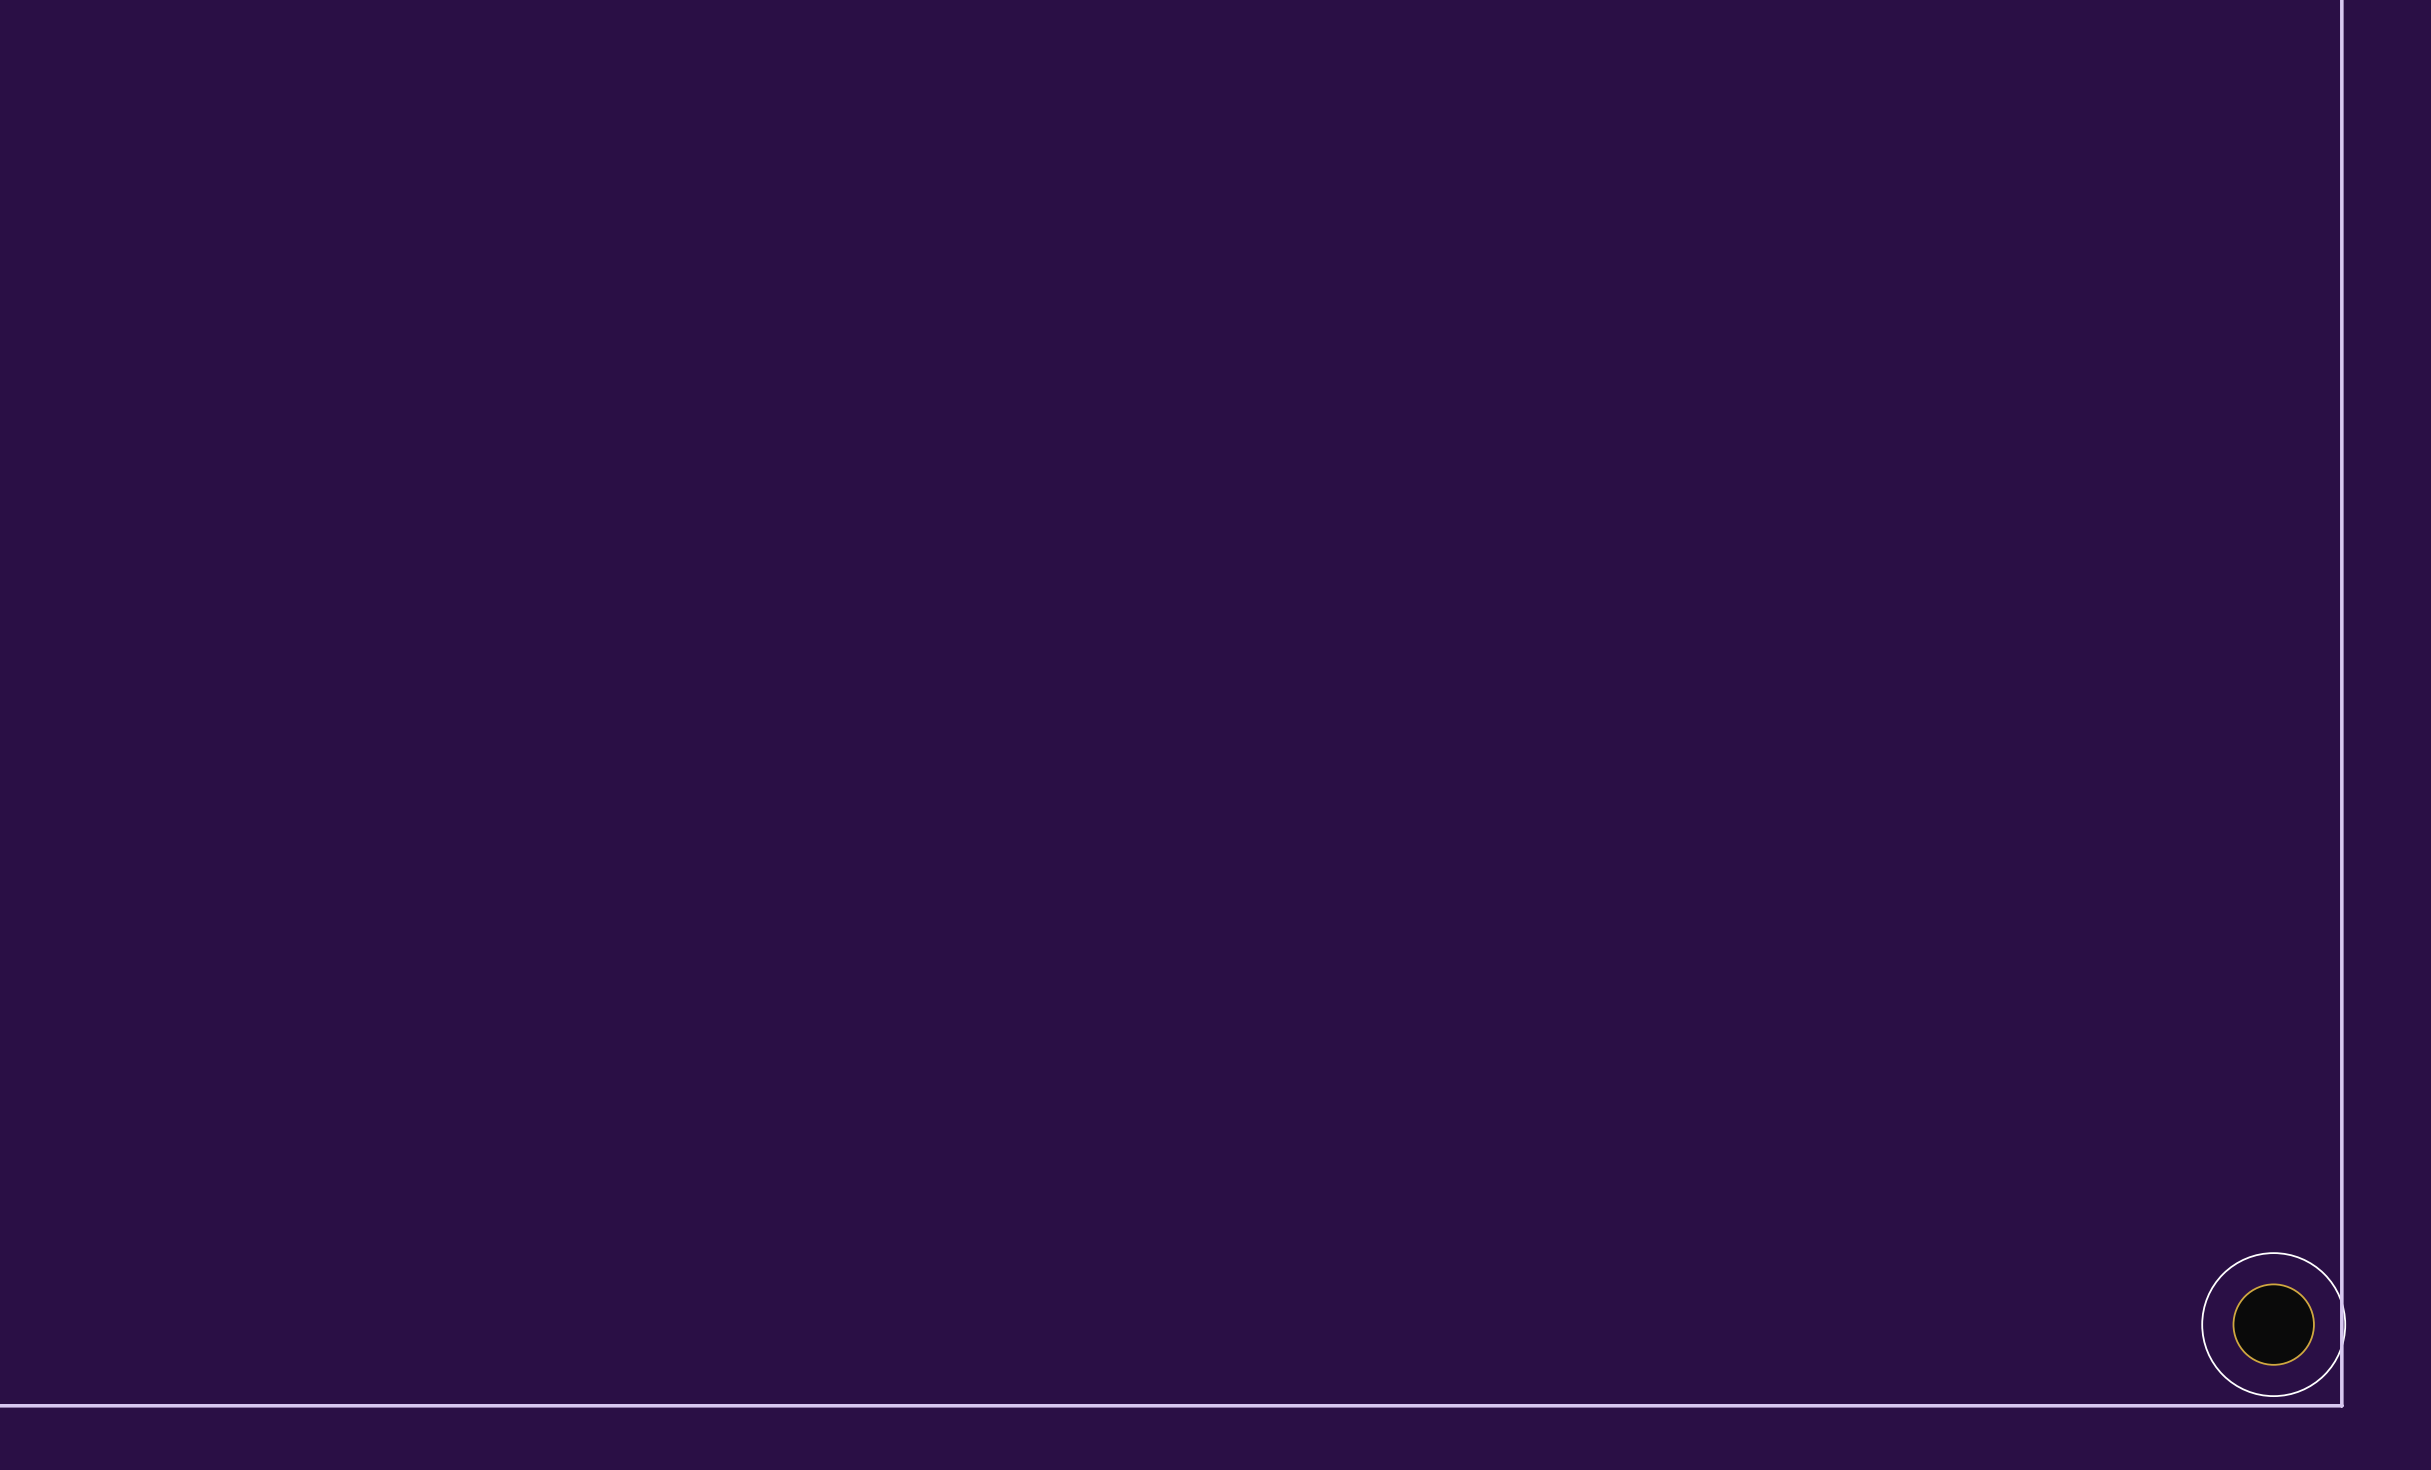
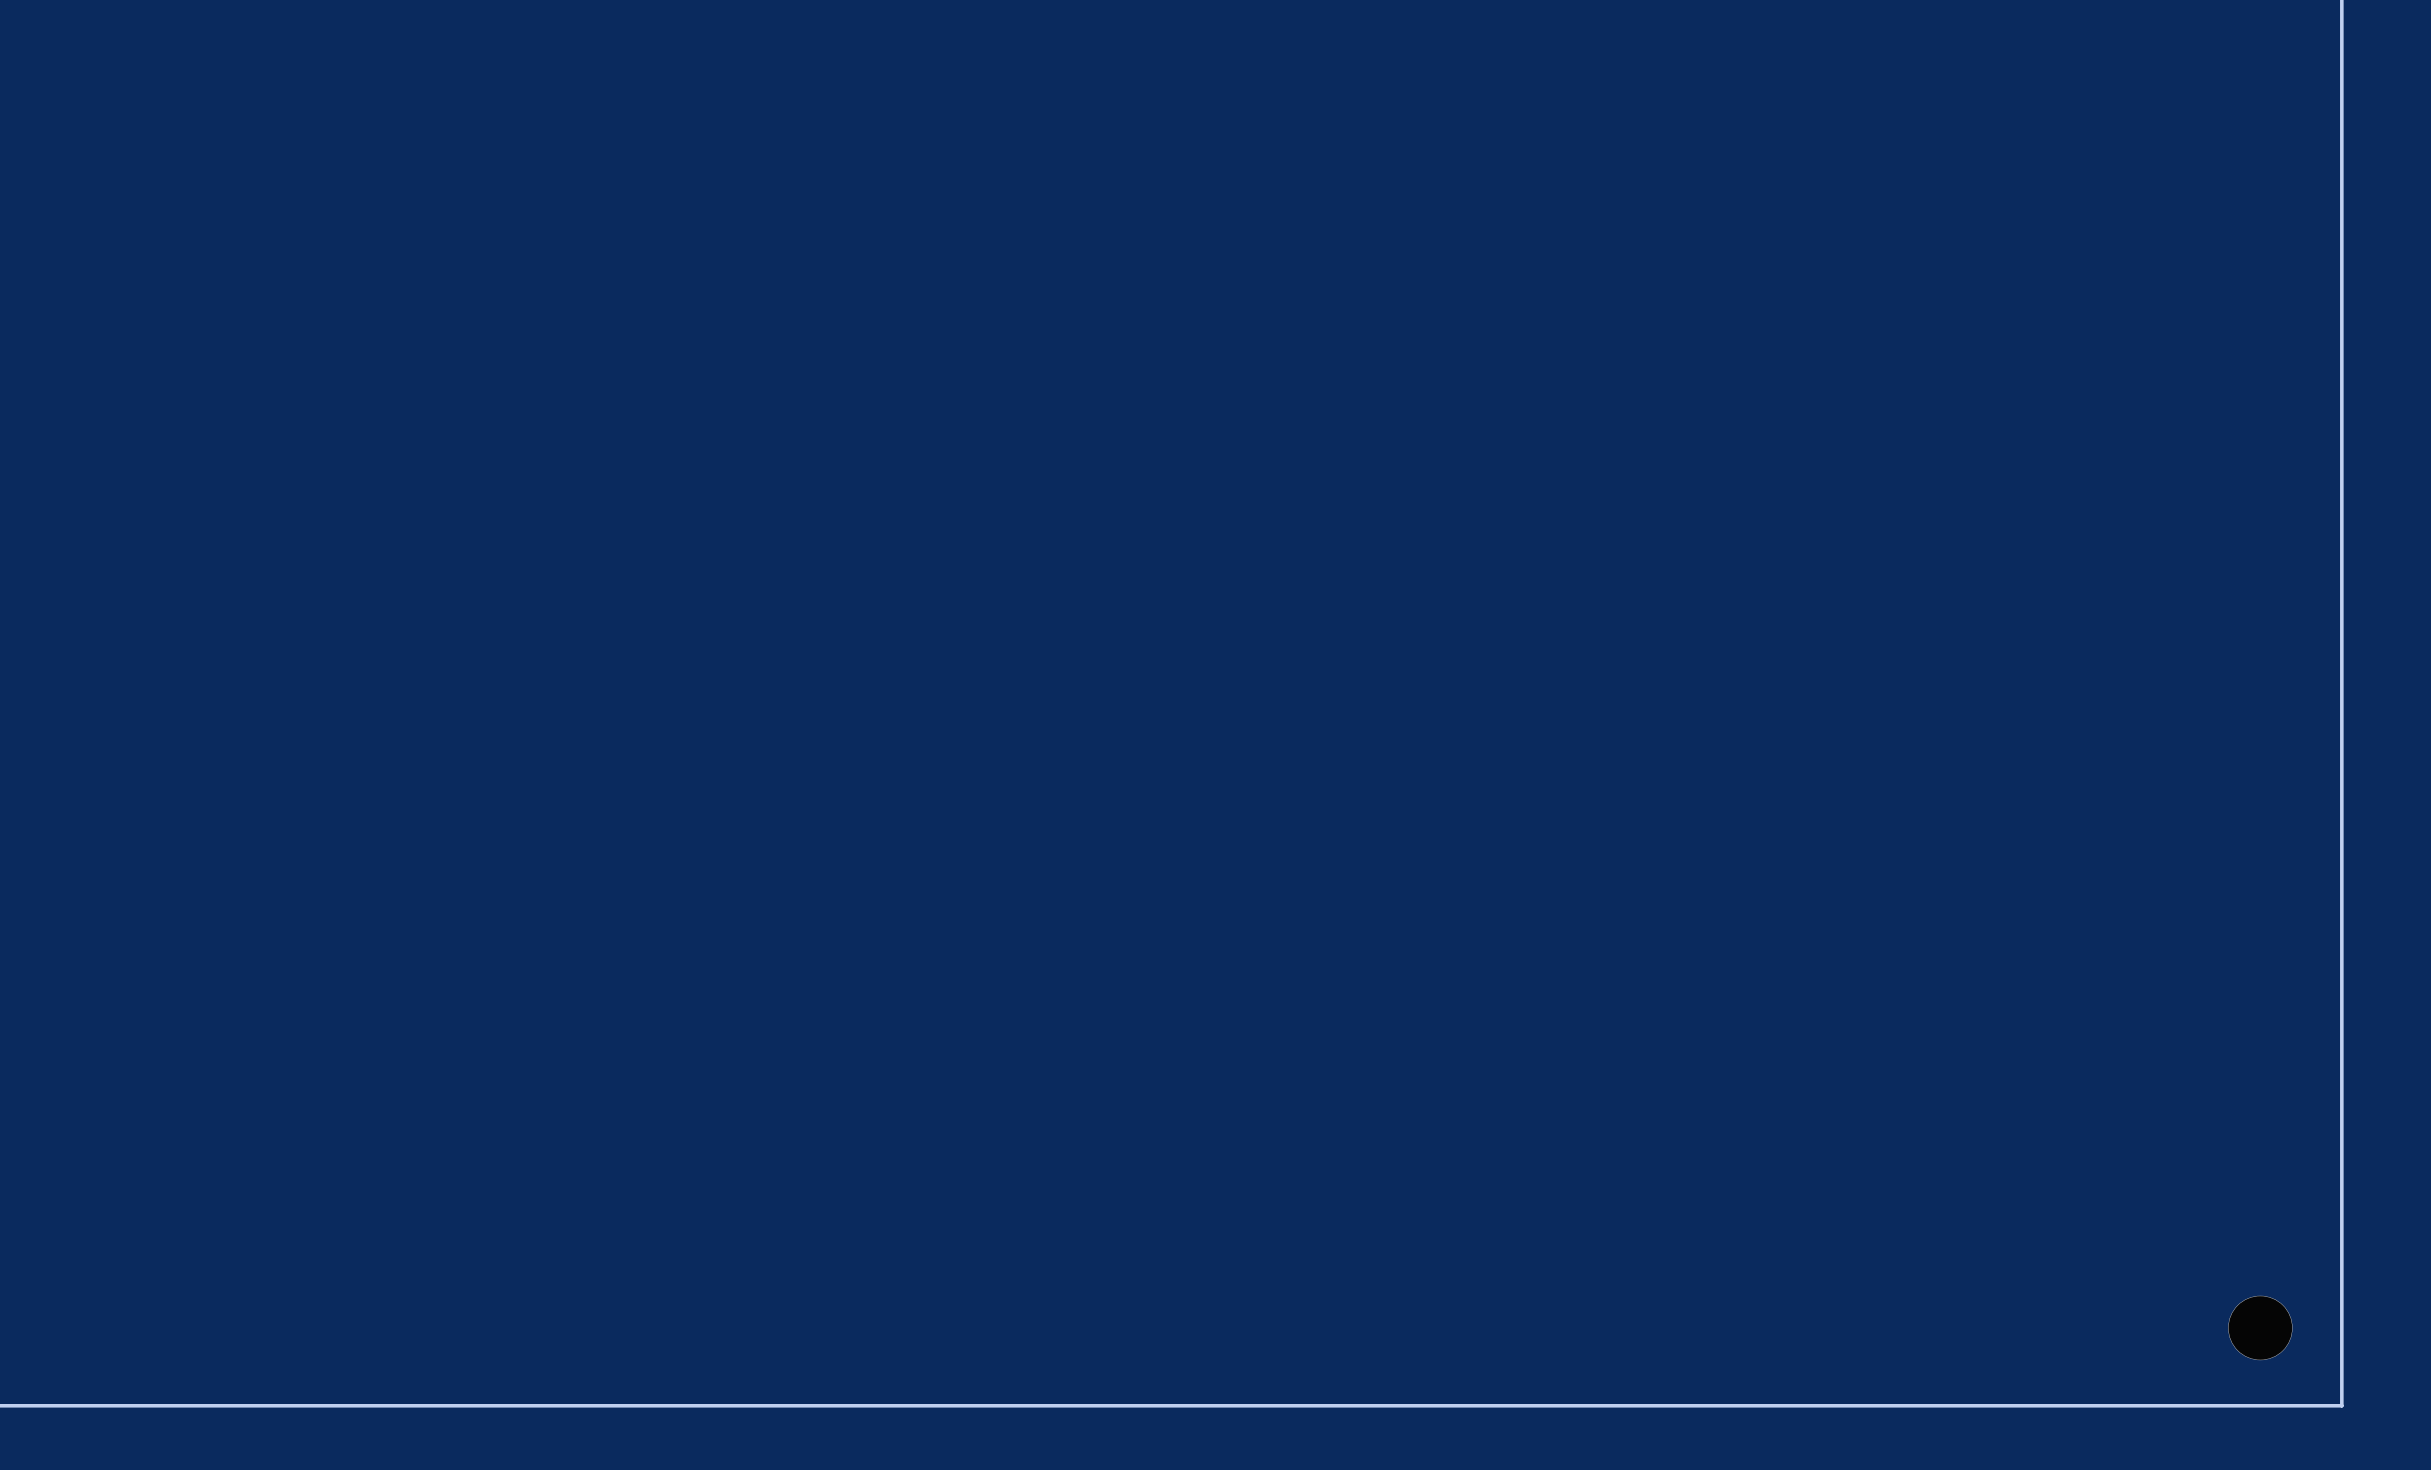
drawing: [2201, 1252, 2347, 1398] -> none
via size: [2232, 1283, 2315, 1366] -> [2228, 1295, 2293, 1361]

